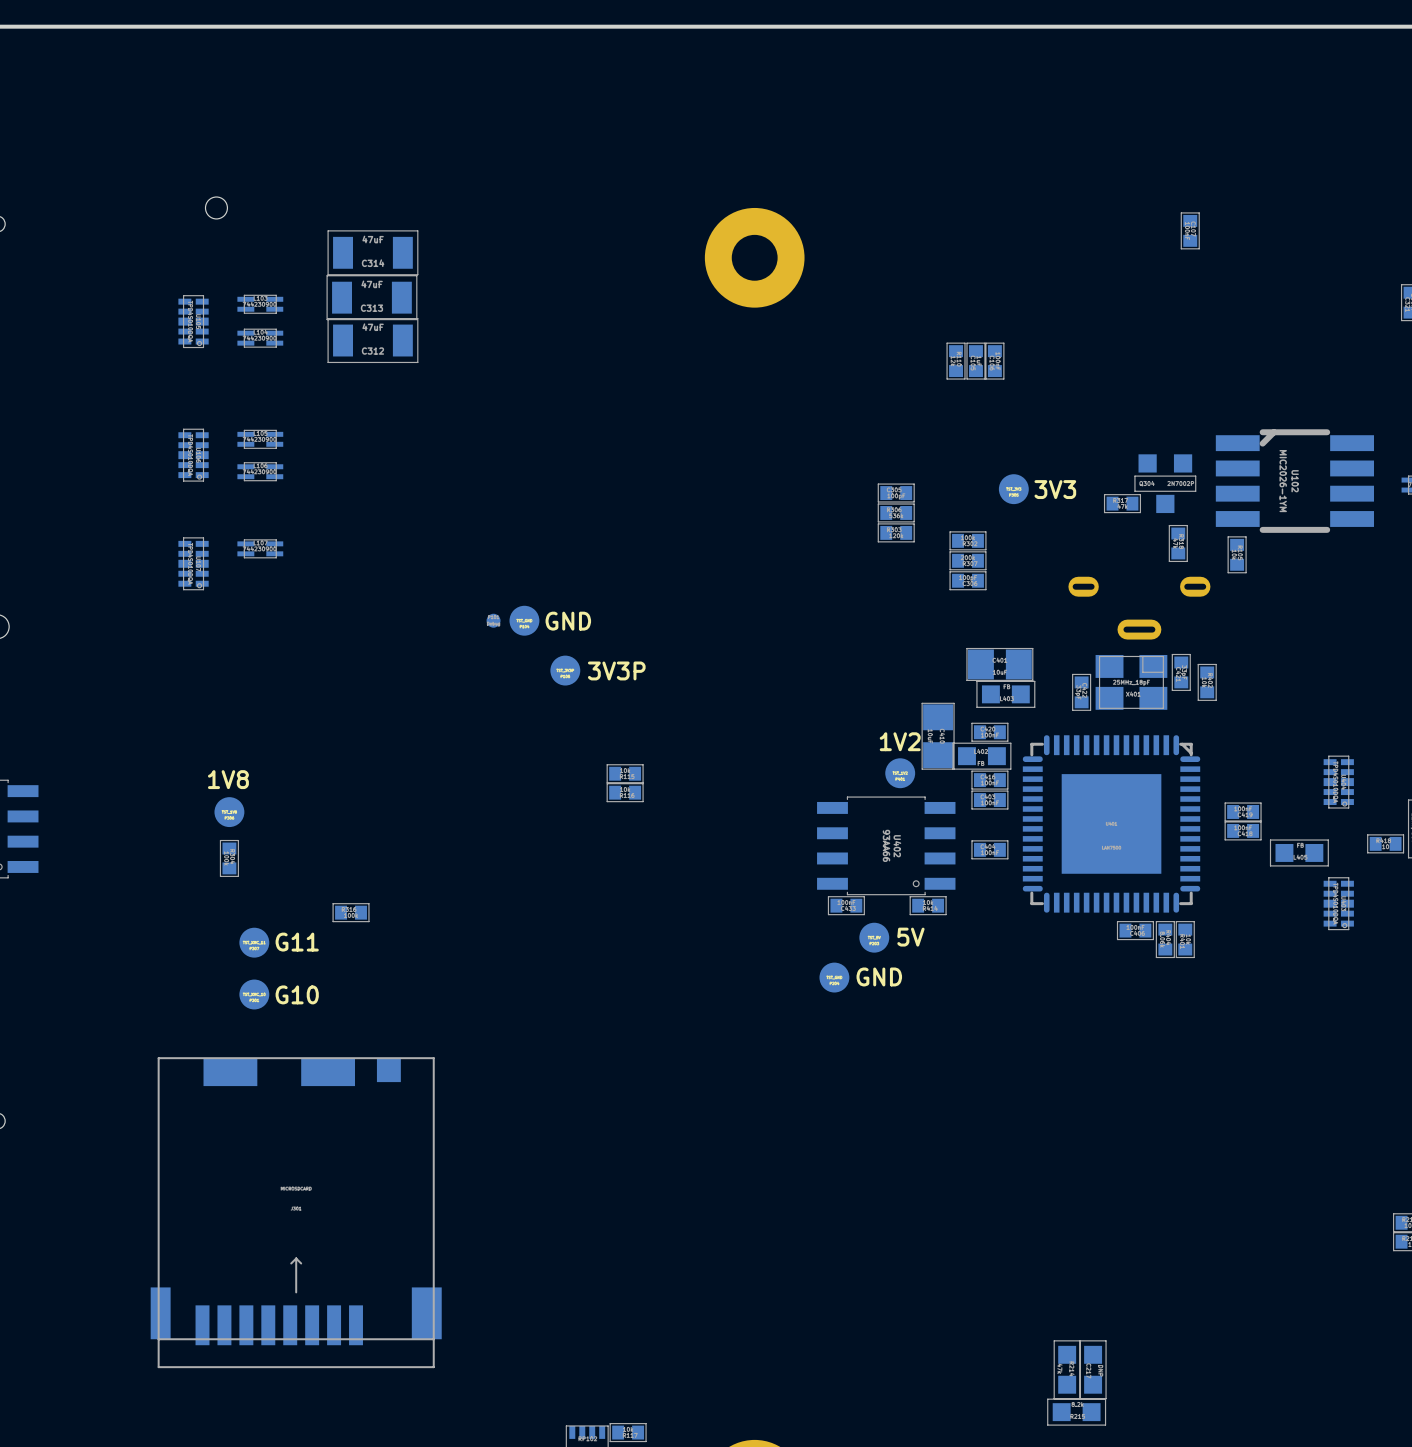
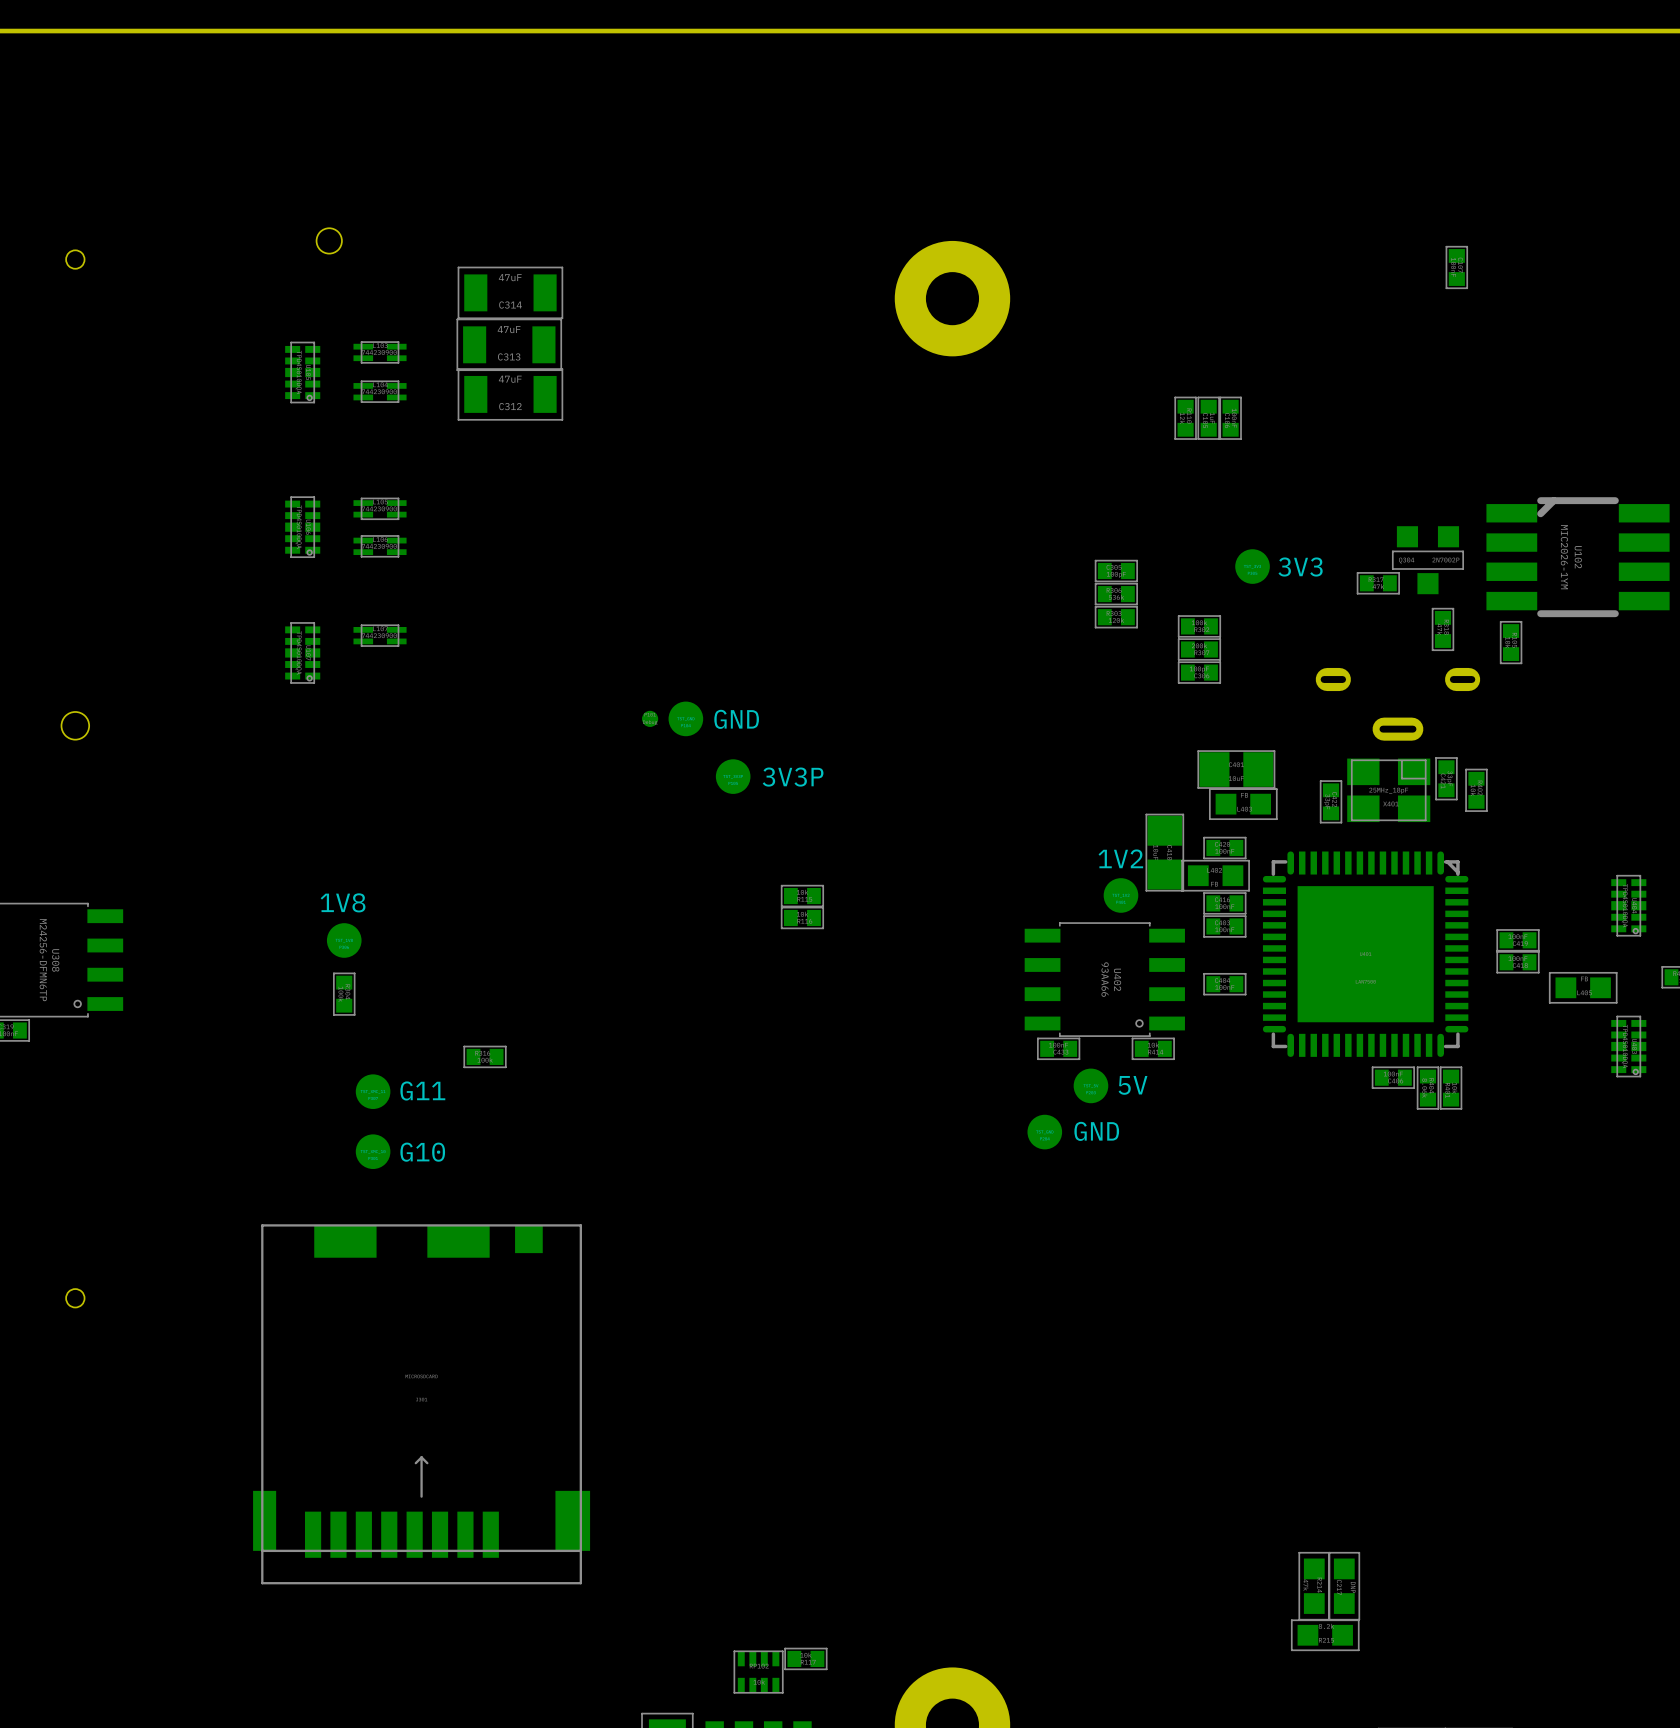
part footprint: [1022, 735, 1201, 913] -> [1262, 851, 1469, 1057]

